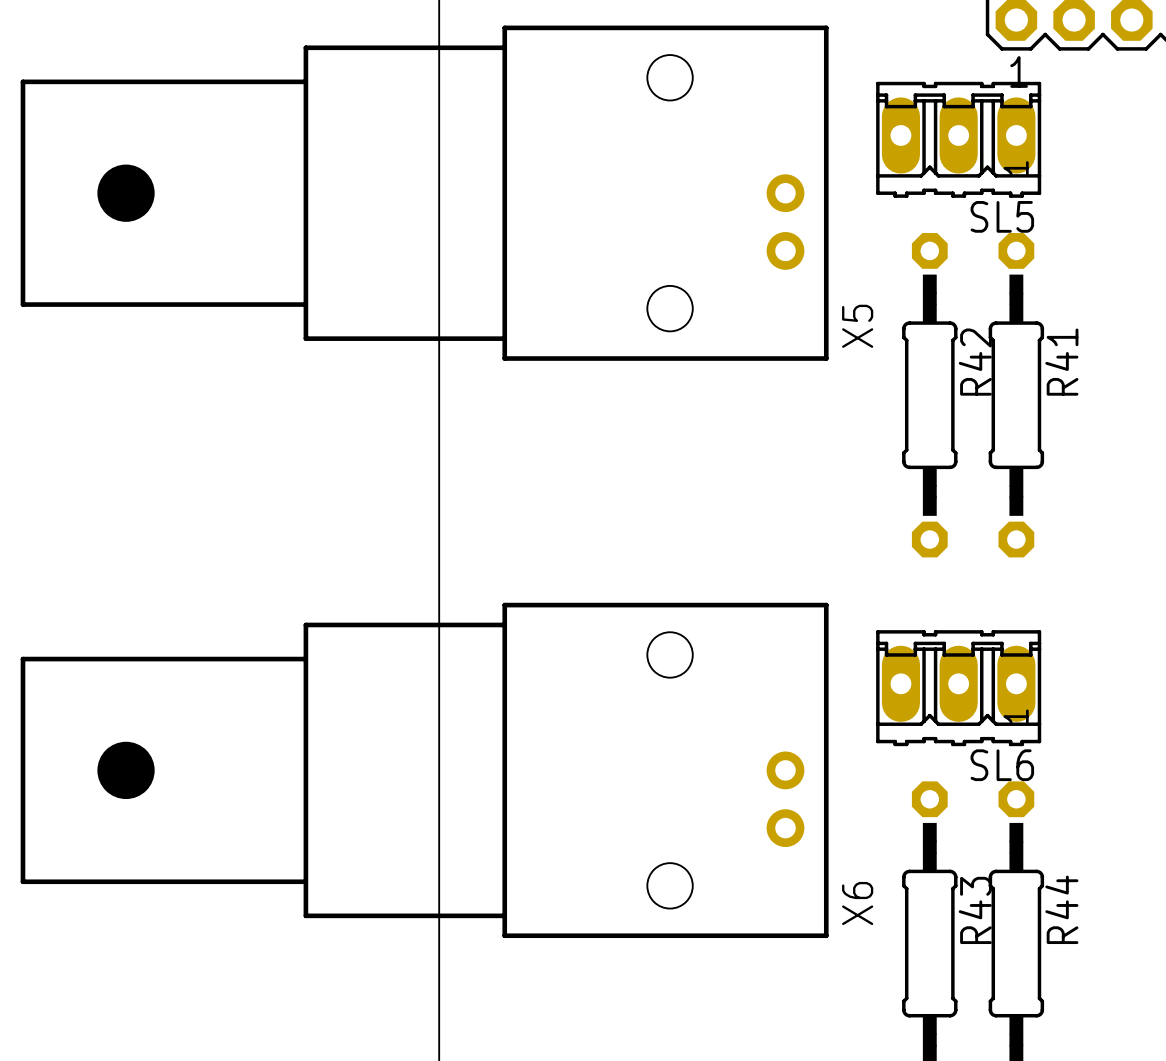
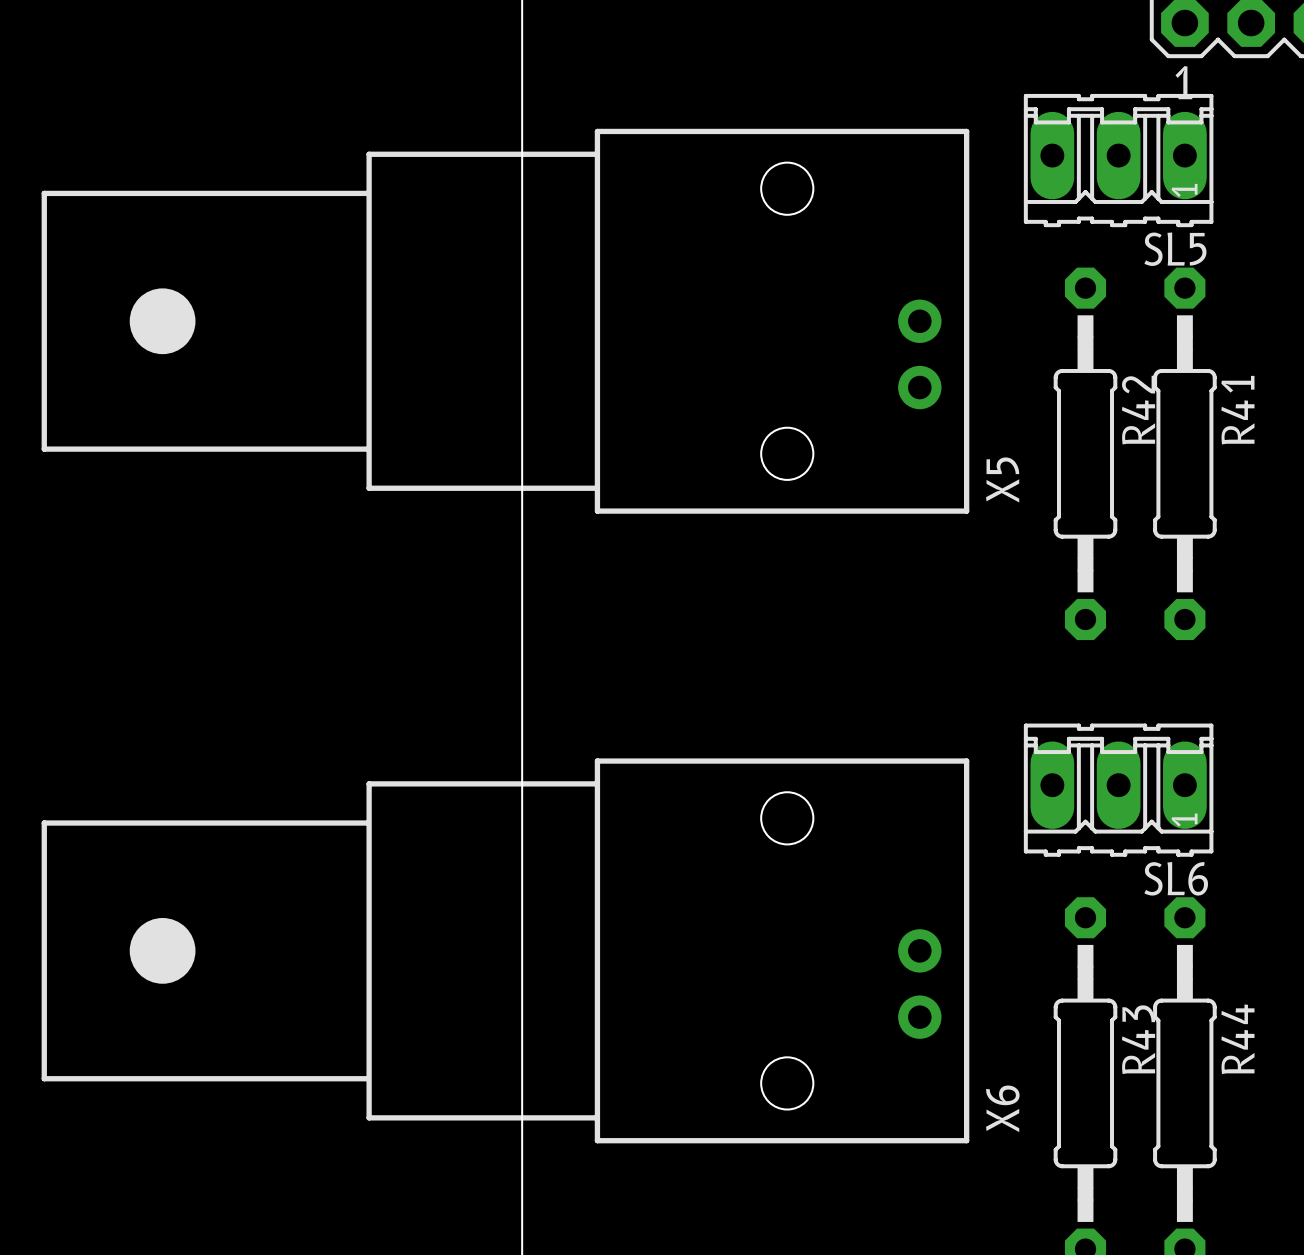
X5 position: (424, 193) -> (505, 321)
X6 position: (424, 770) -> (505, 950)

